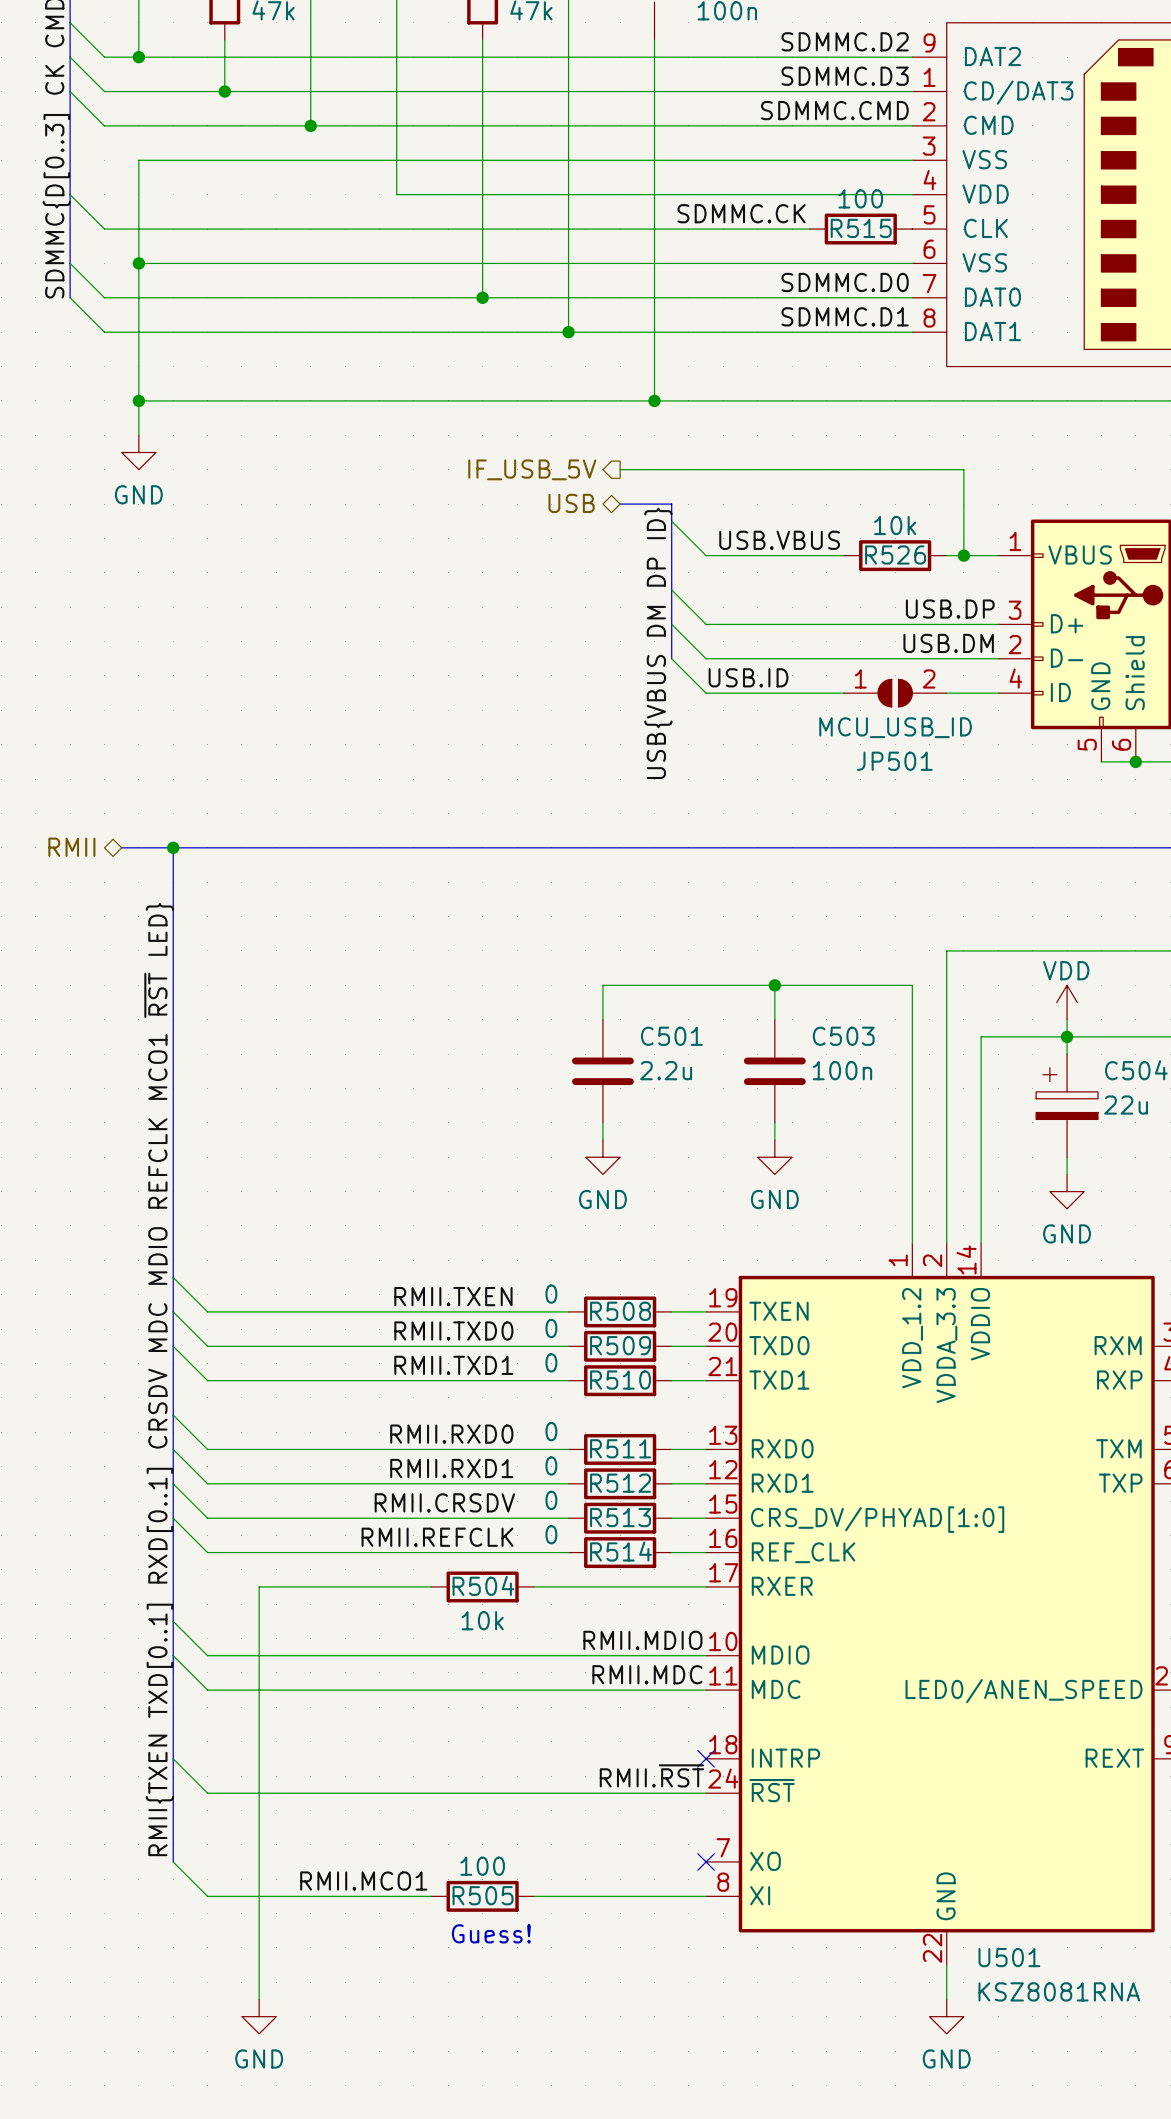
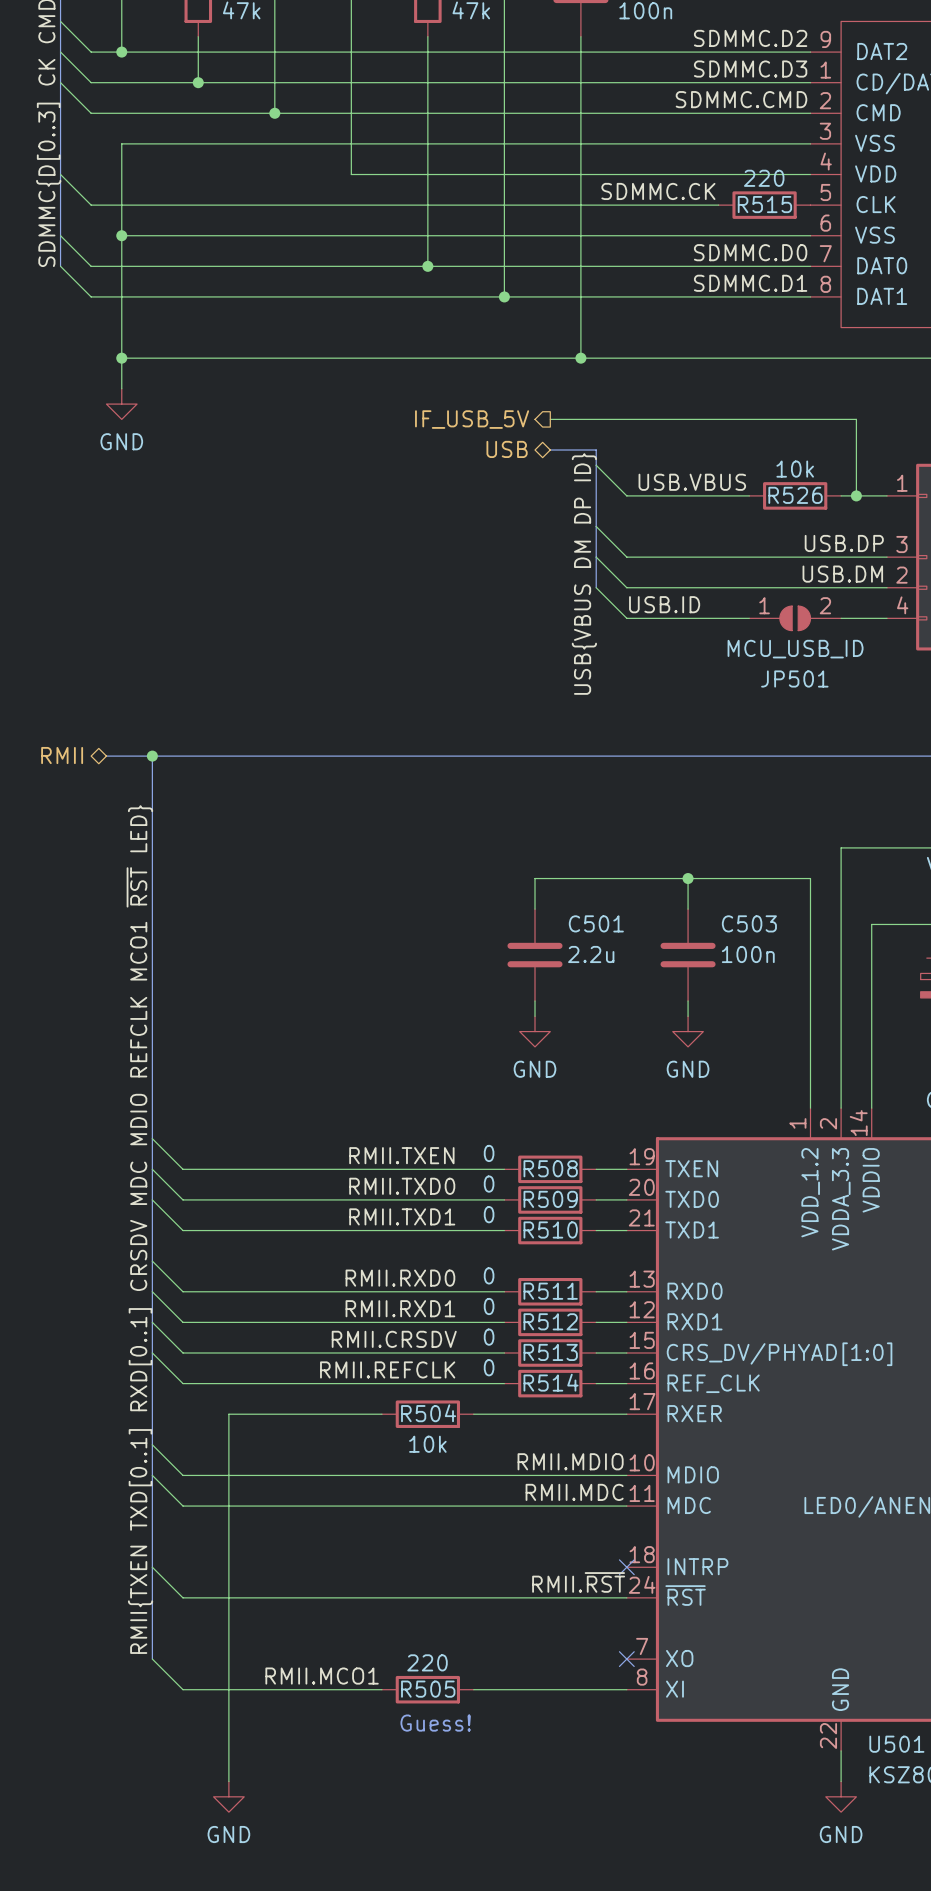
R515 value: 100 (860, 198) -> 220 (764, 178)
R505 value: 100 (482, 1866) -> 220 (427, 1662)

